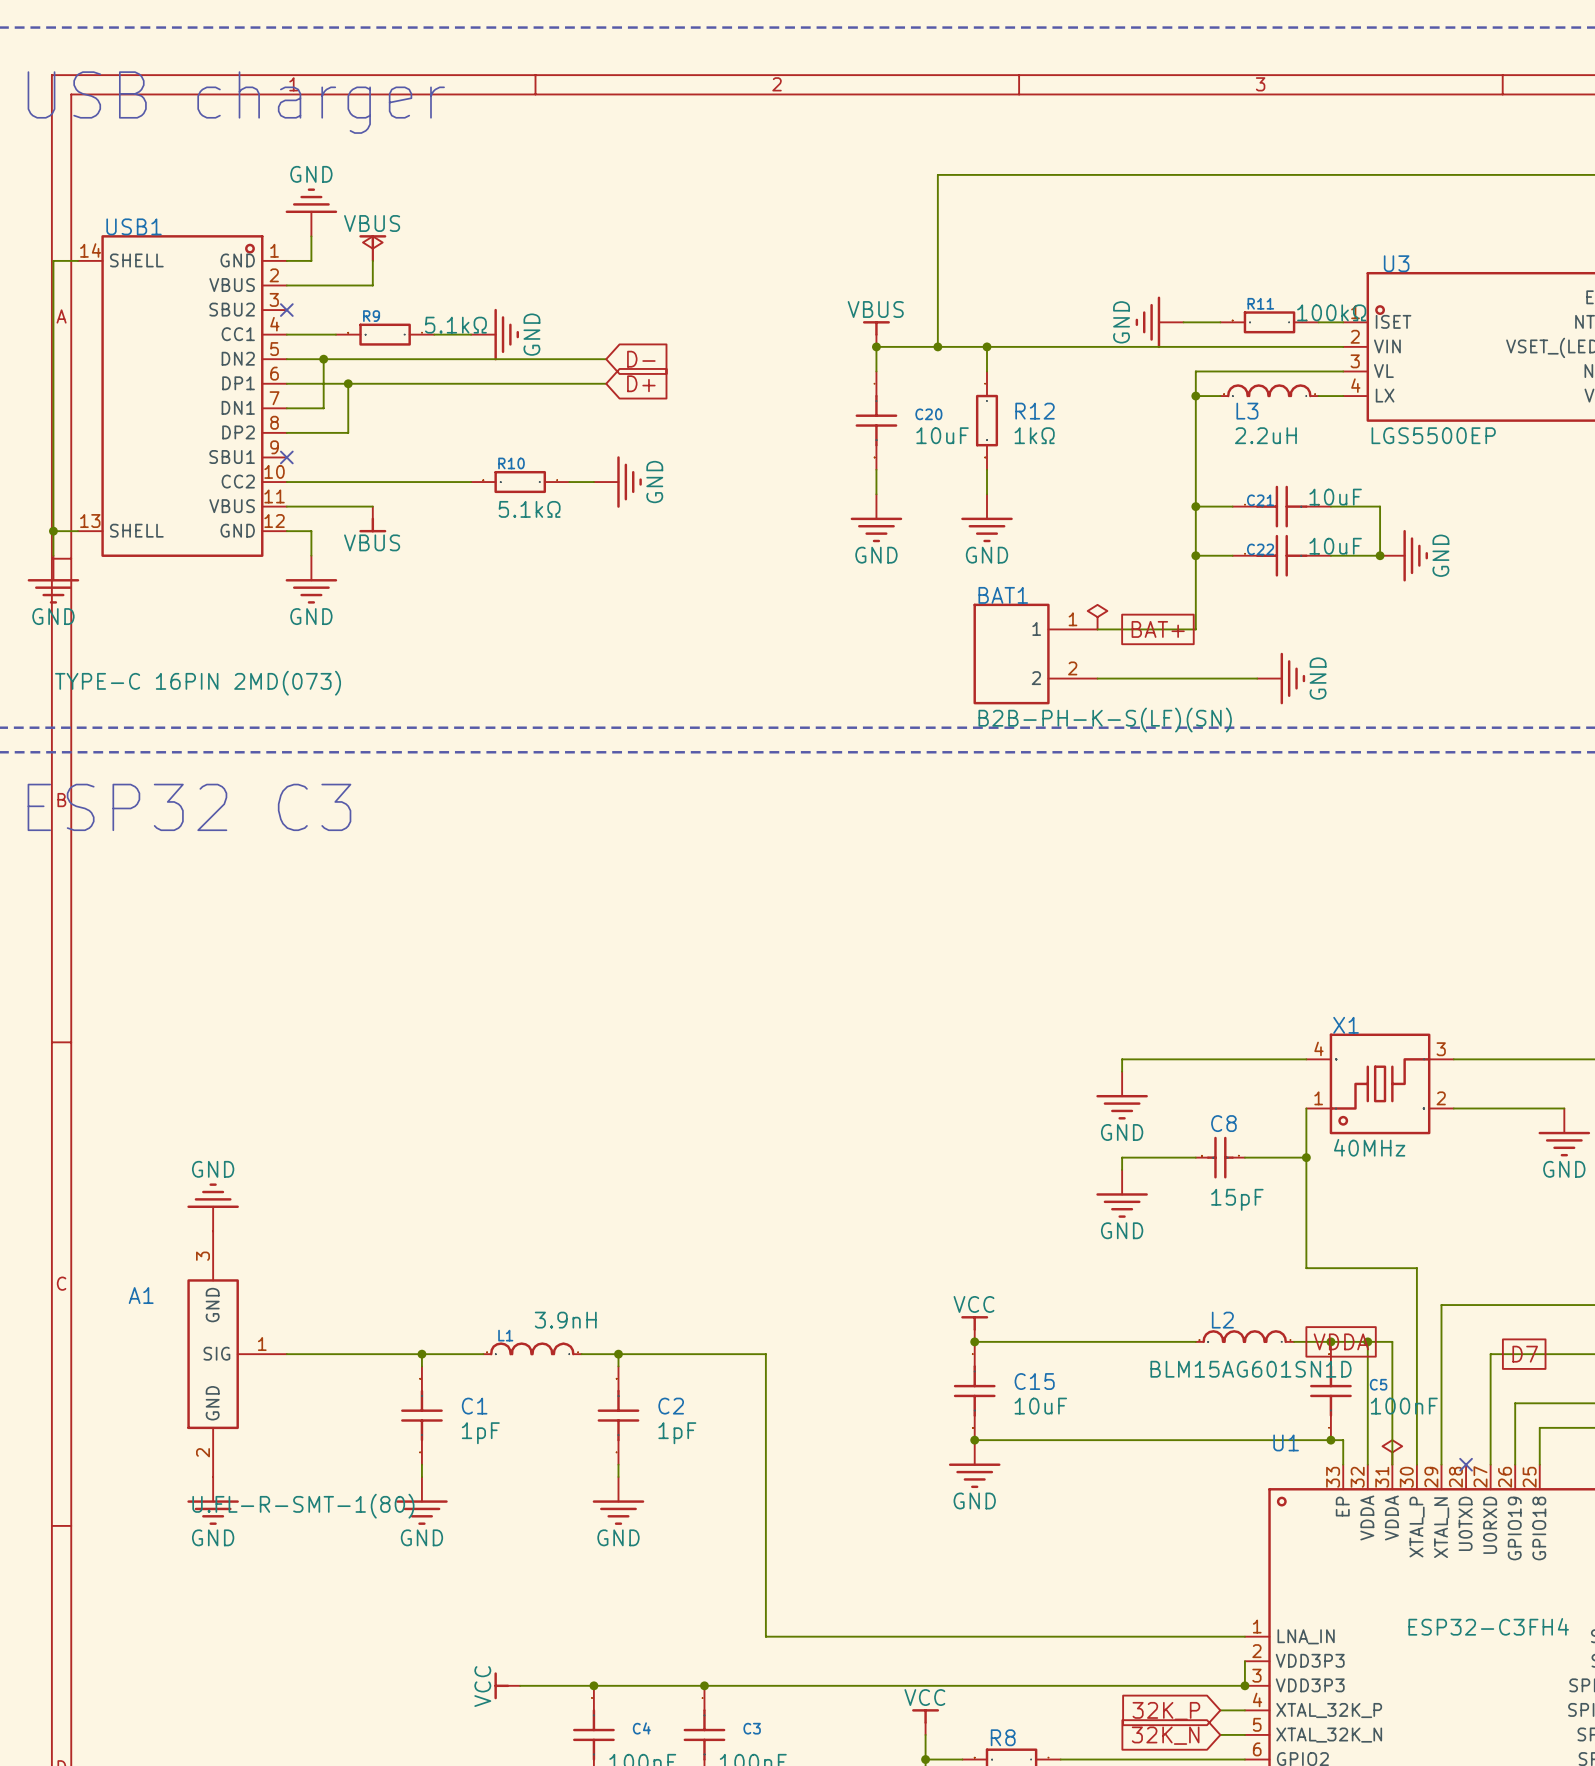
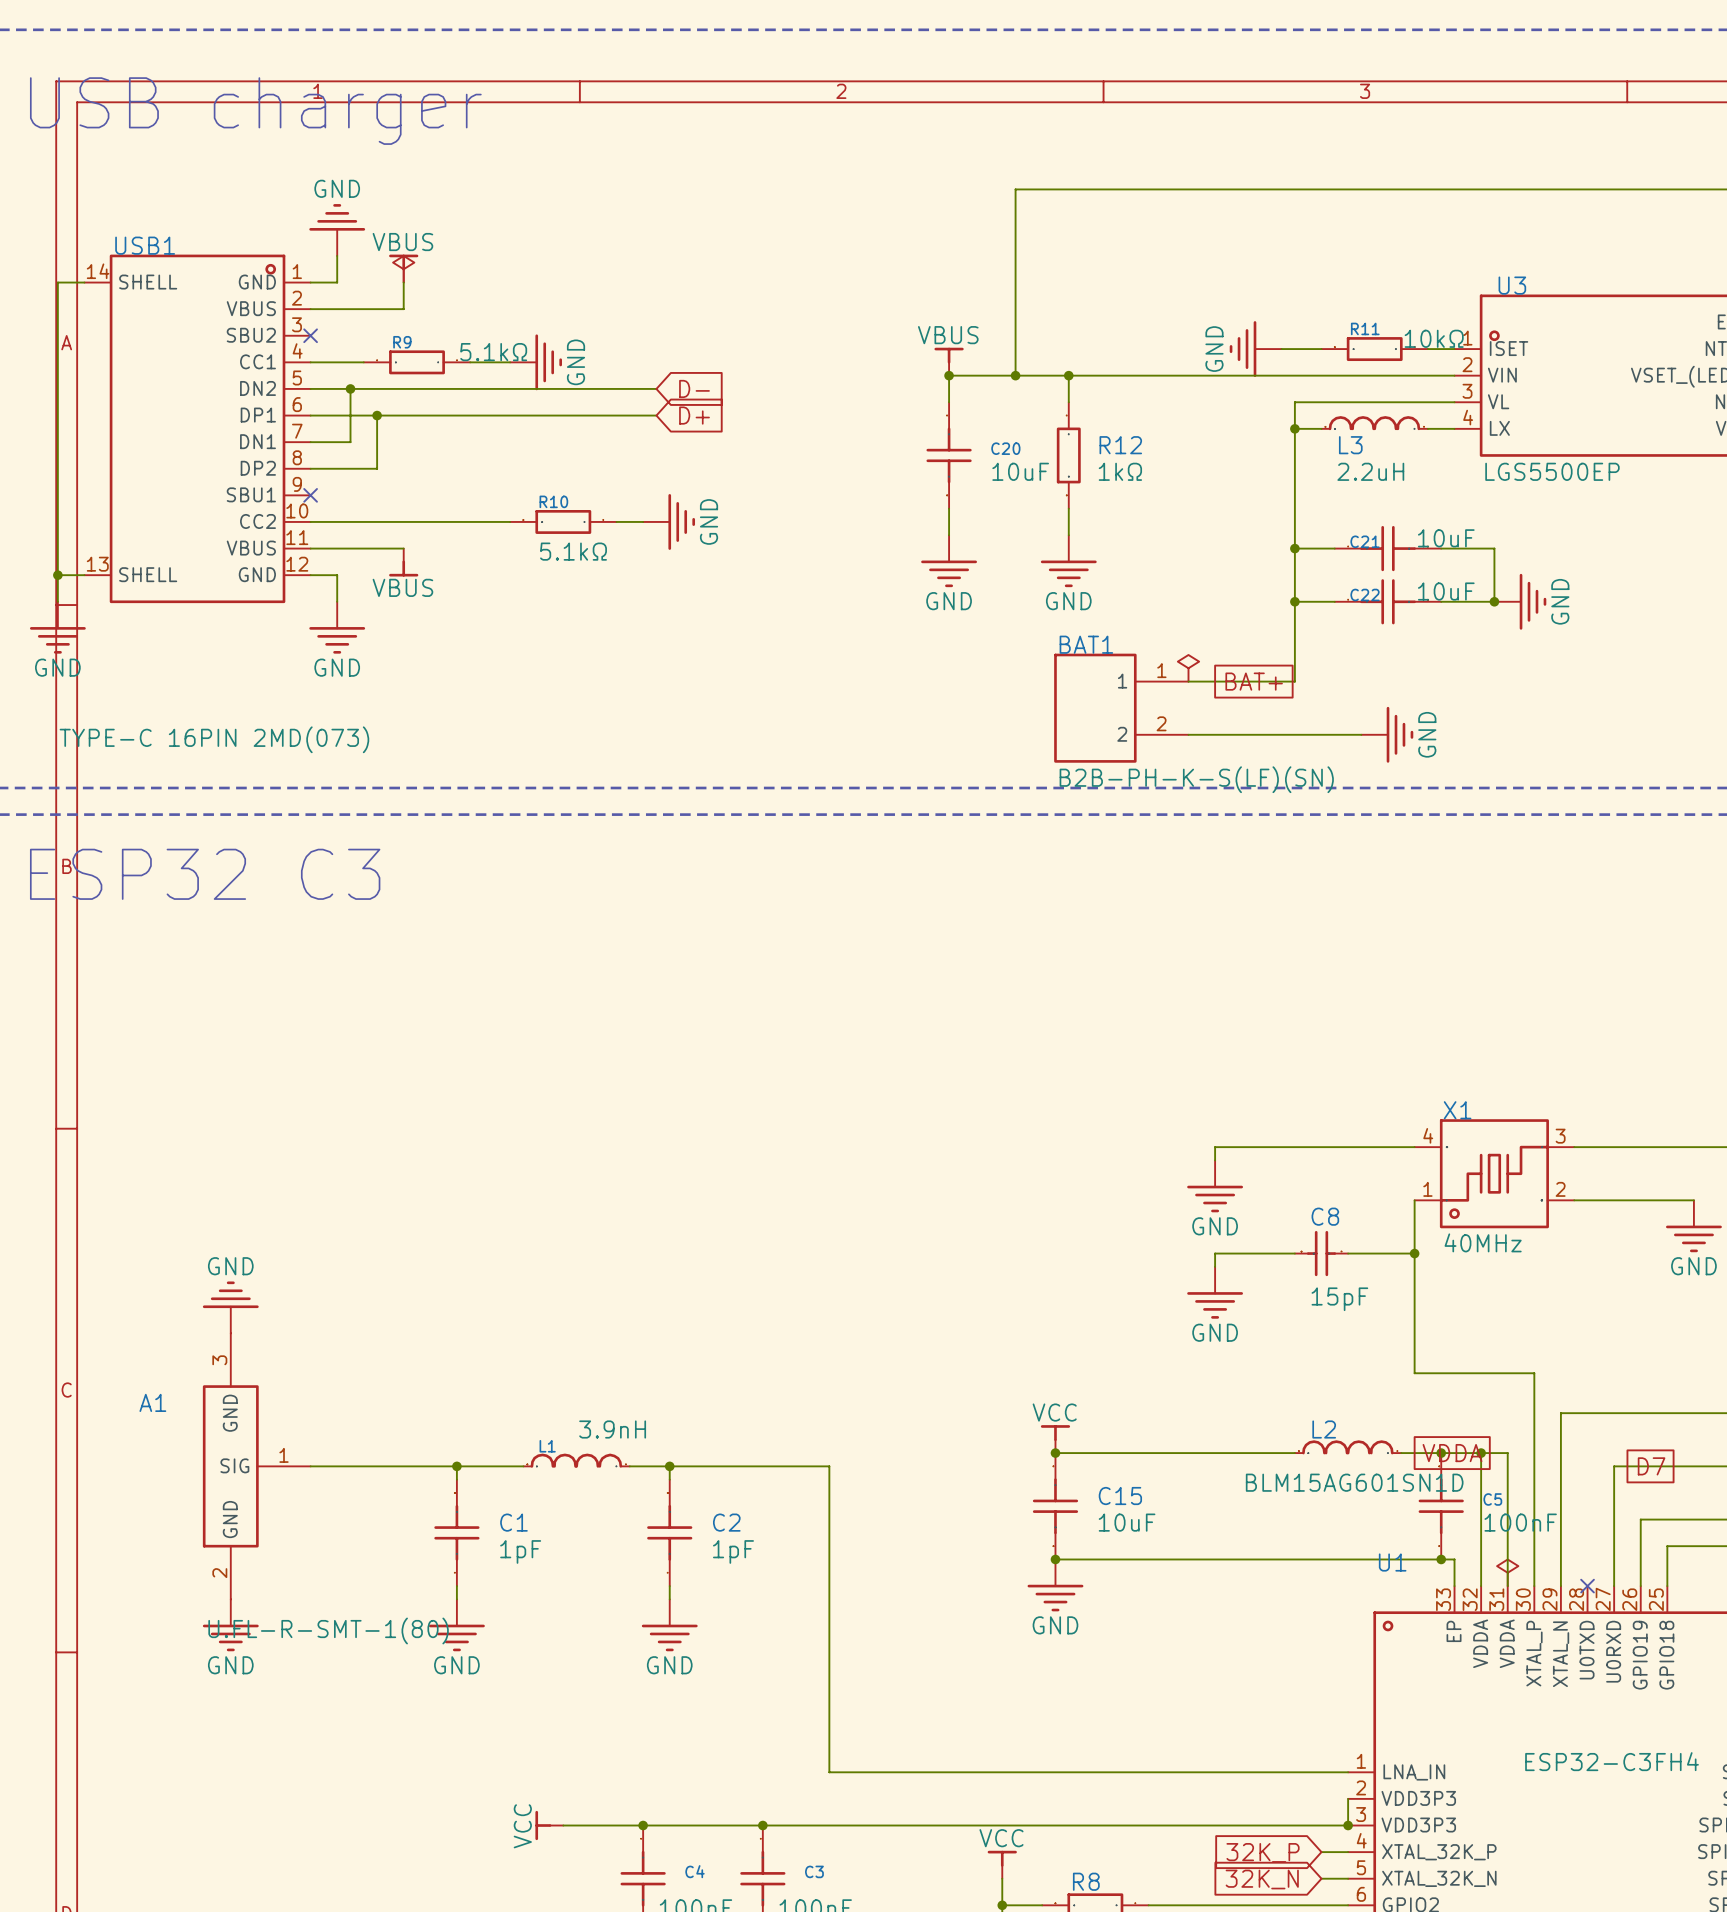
R11 value: 100kΩ (1331, 312) -> 10kΩ (1434, 338)

